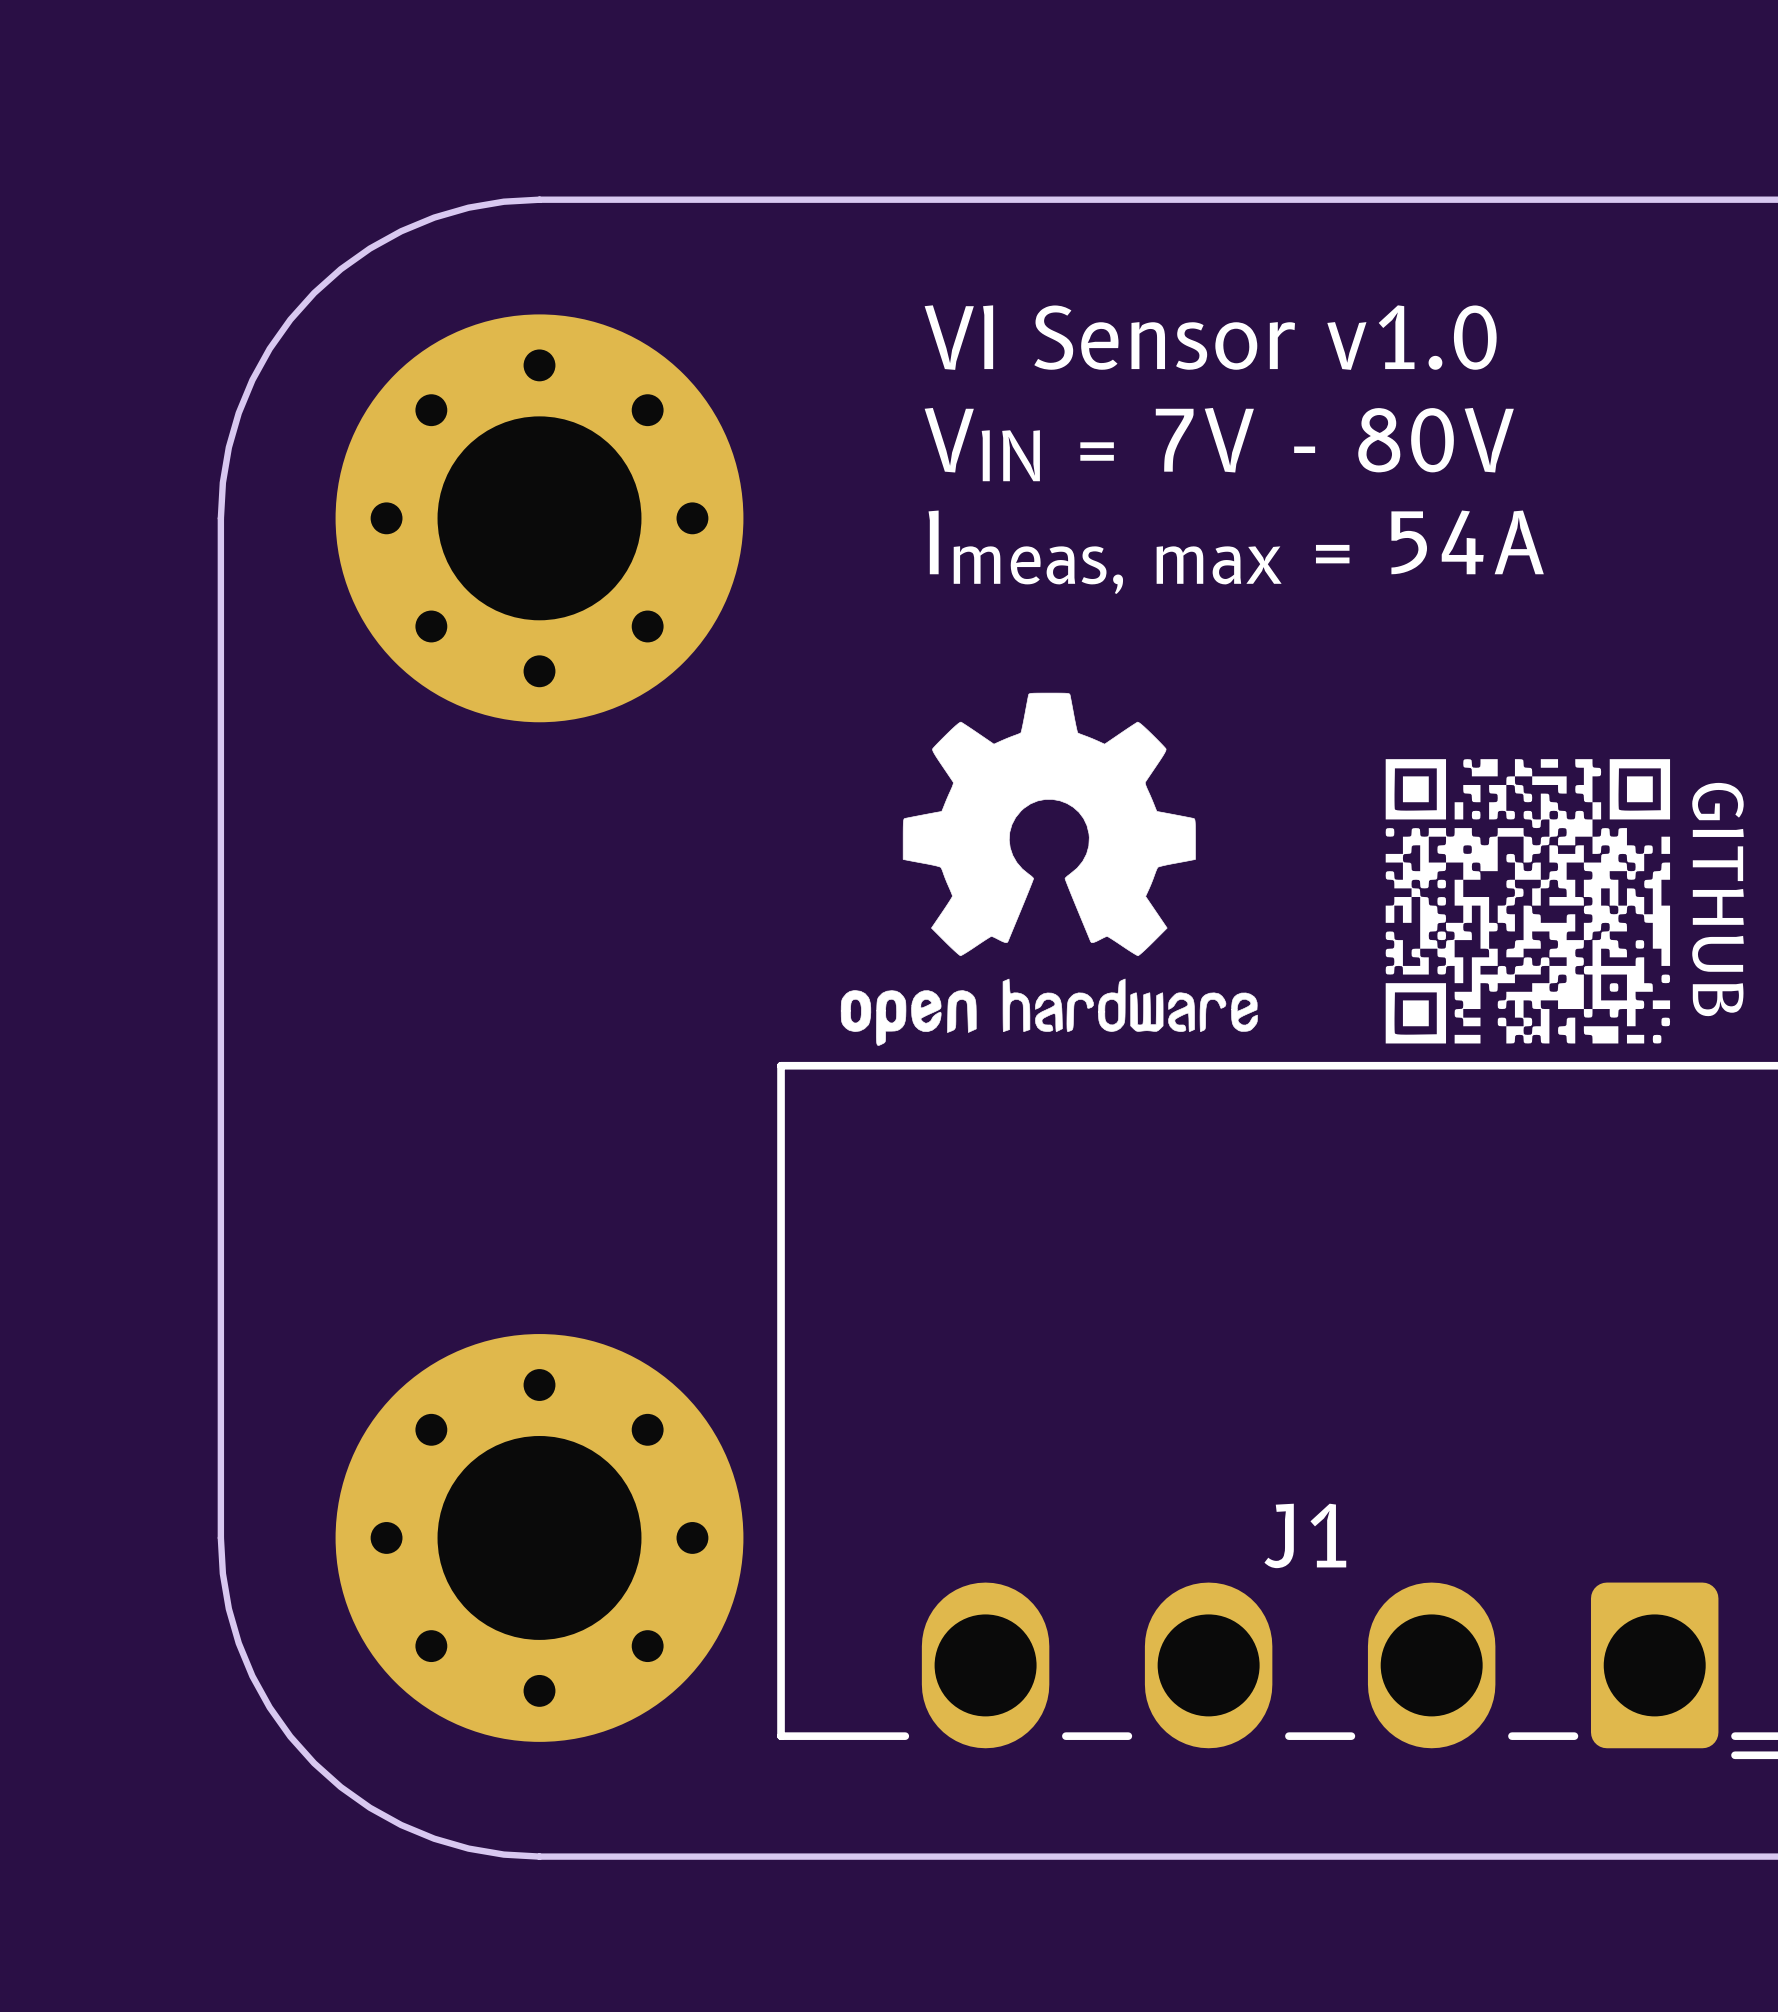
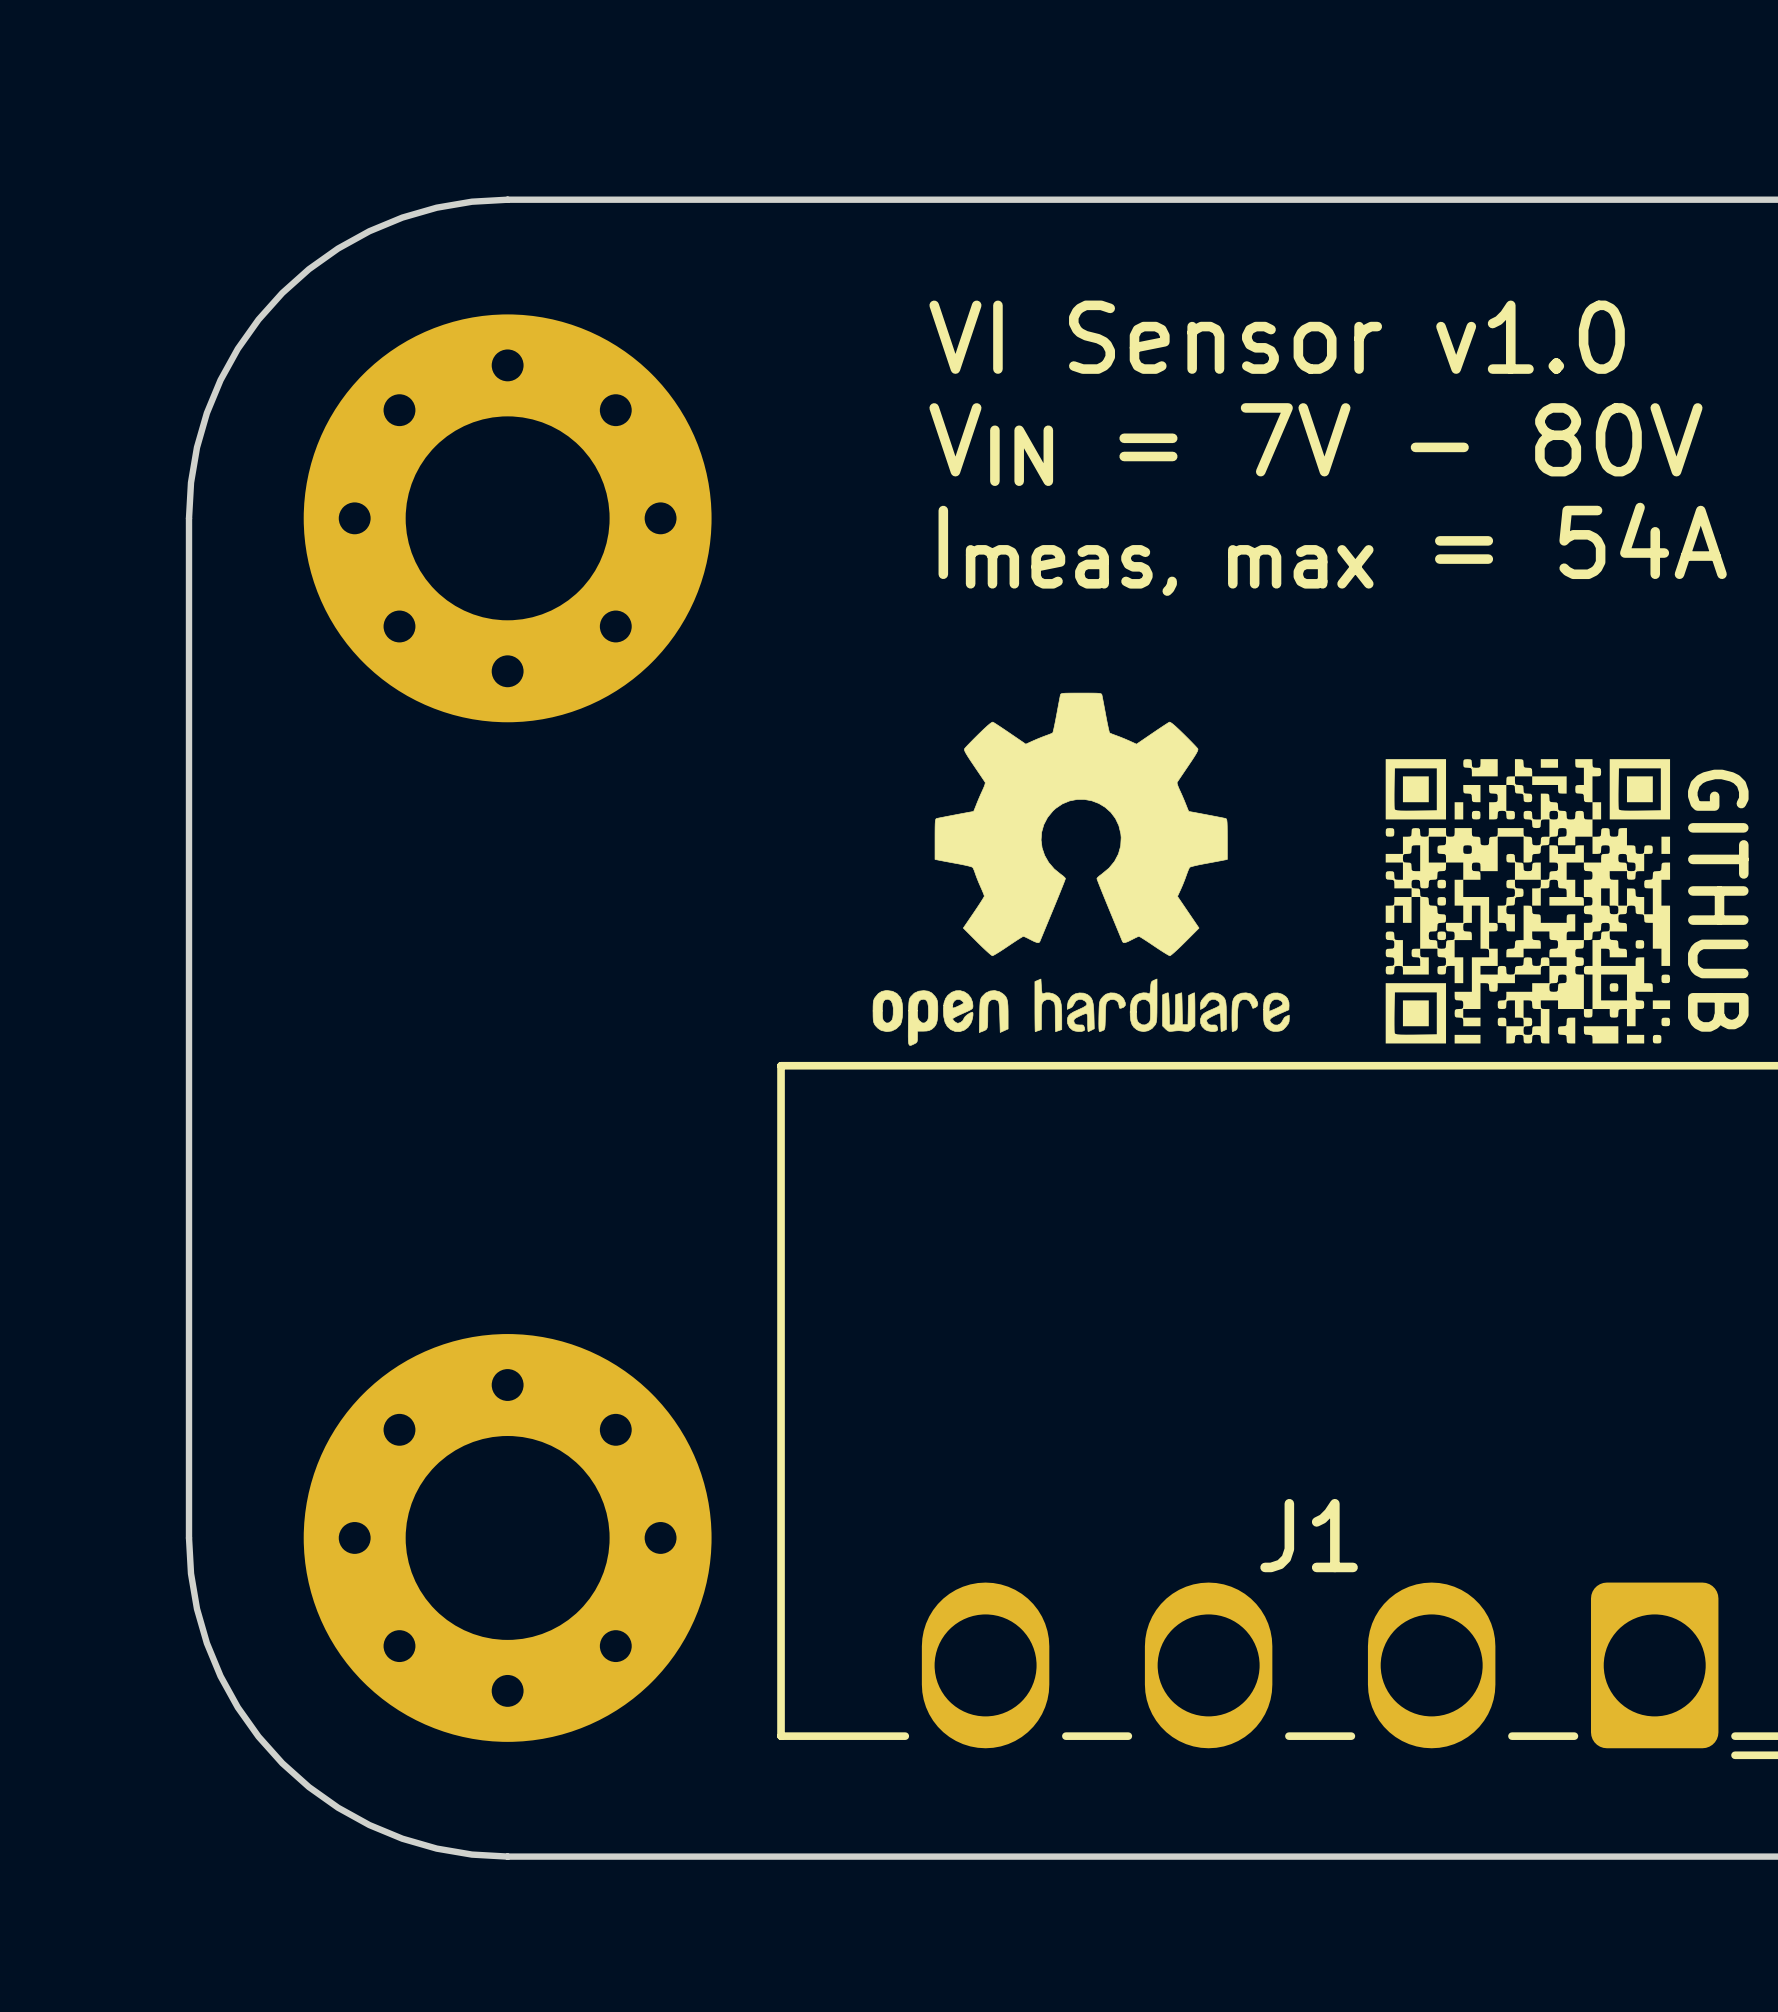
board edge: (539, 199) (503, 201) (468, 207) (434, 217) (401, 231) (369, 248) (340, 269) (314, 293) (290, 319) (269, 348) (252, 380) (238, 413) (228, 447) (222, 482) (220, 518) (220, 1537) (222, 1573) (228, 1608) (238, 1643) (252, 1676) (269, 1707) (290, 1736) (314, 1763) (340, 1787) (369, 1807) (401, 1825) (434, 1838) (468, 1848) (503, 1854) (539, 1856) -> (539, 199) (471, 201) (436, 207) (402, 217) (369, 231) (338, 248) (308, 269) (282, 293) (258, 319) (237, 348) (220, 380) (206, 413) (196, 447) (191, 482) (189, 518) (189, 1537) (191, 1573) (196, 1608) (206, 1643) (220, 1676) (237, 1707) (258, 1736) (282, 1763) (308, 1787) (338, 1807) (369, 1825) (402, 1838) (436, 1848) (471, 1854) (539, 1856)
part position: (539, 518) -> (507, 518)
drawing position: (1049, 869) -> (1081, 869)
part position: (539, 1537) -> (507, 1537)

